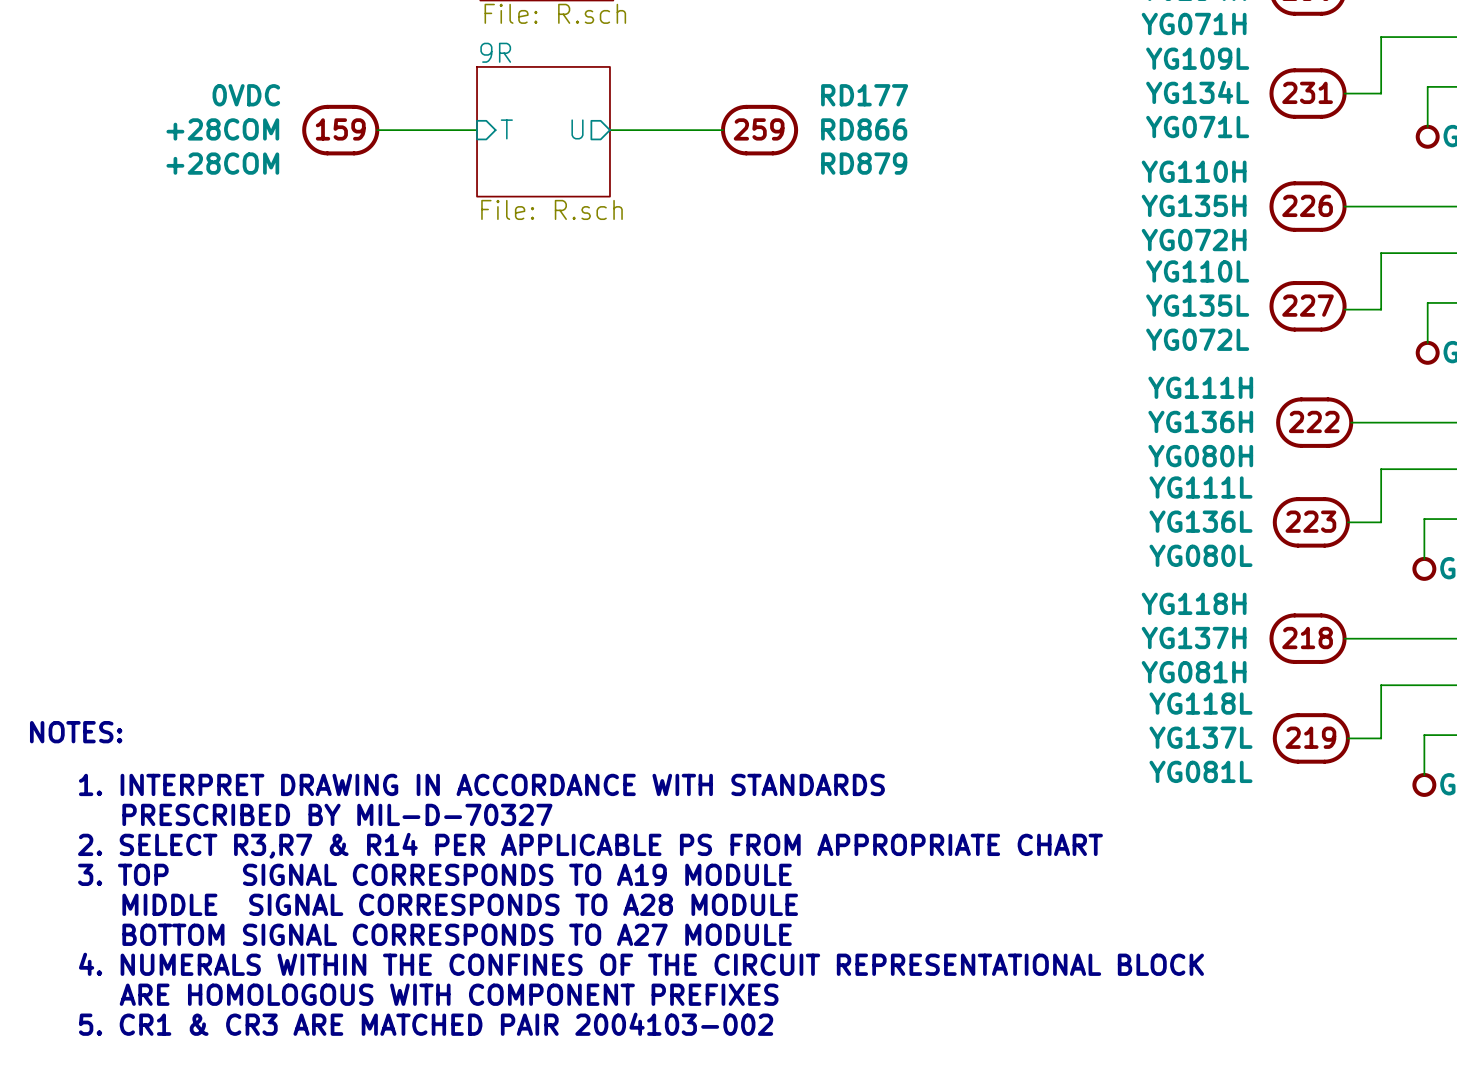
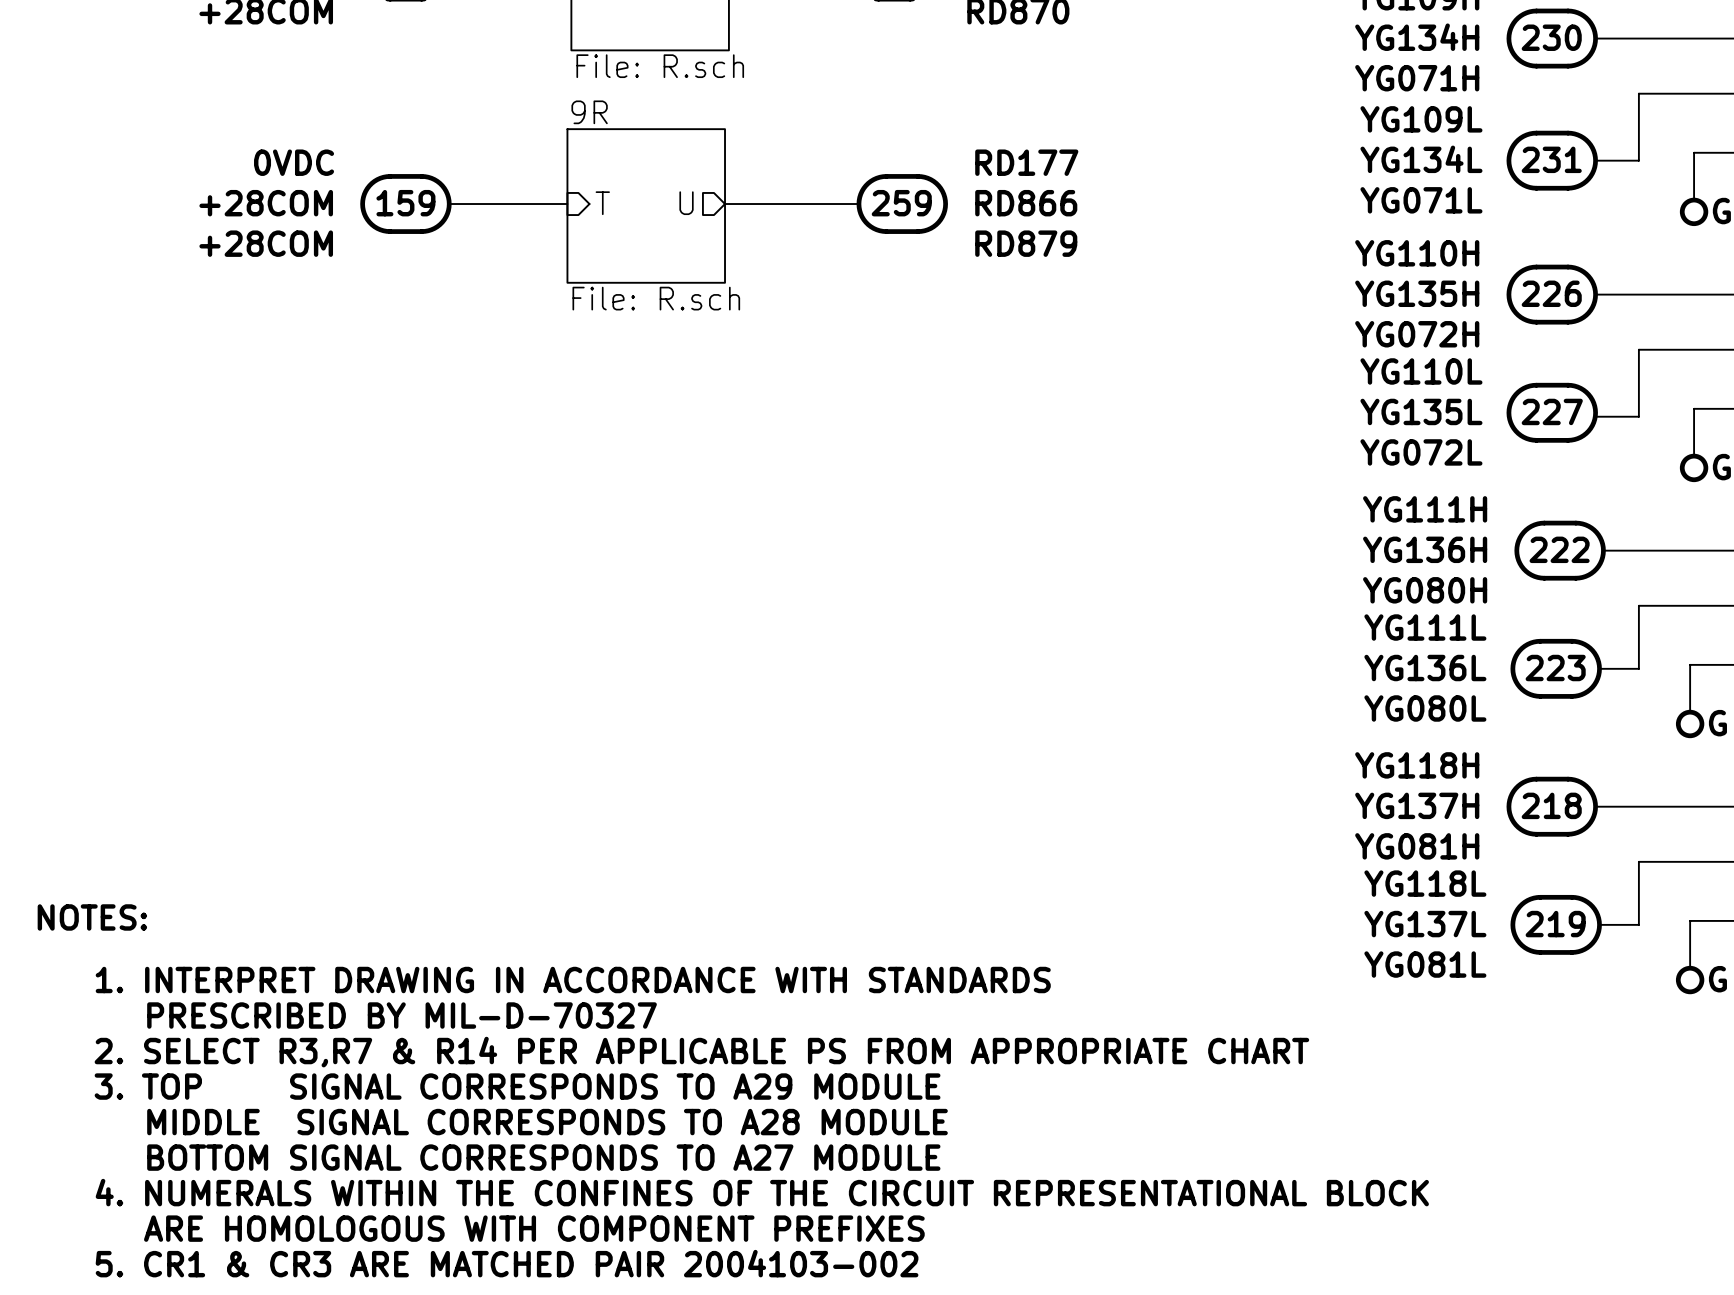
text: 3. TOP SIGNAL CORRESPONDS TO A19 MODULE (434, 874) -> 3. TOP SIGNAL CORRESPONDS TO A29 MODULE (517, 1086)

